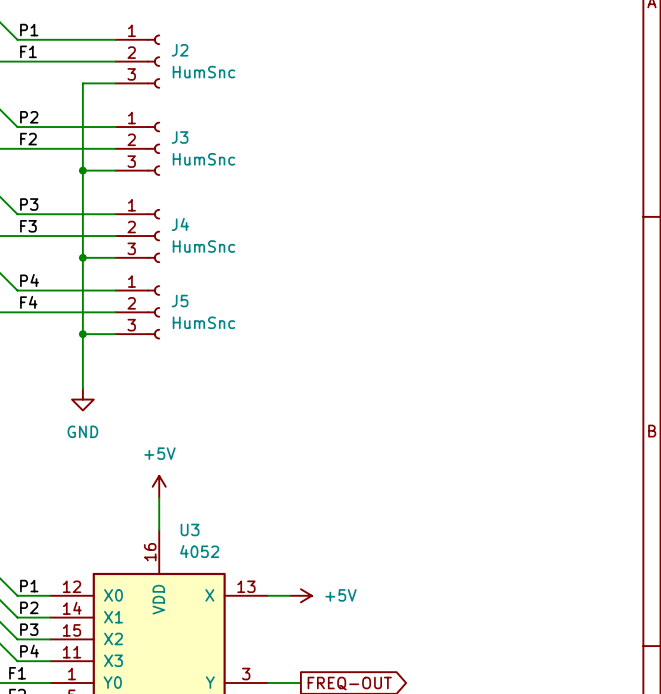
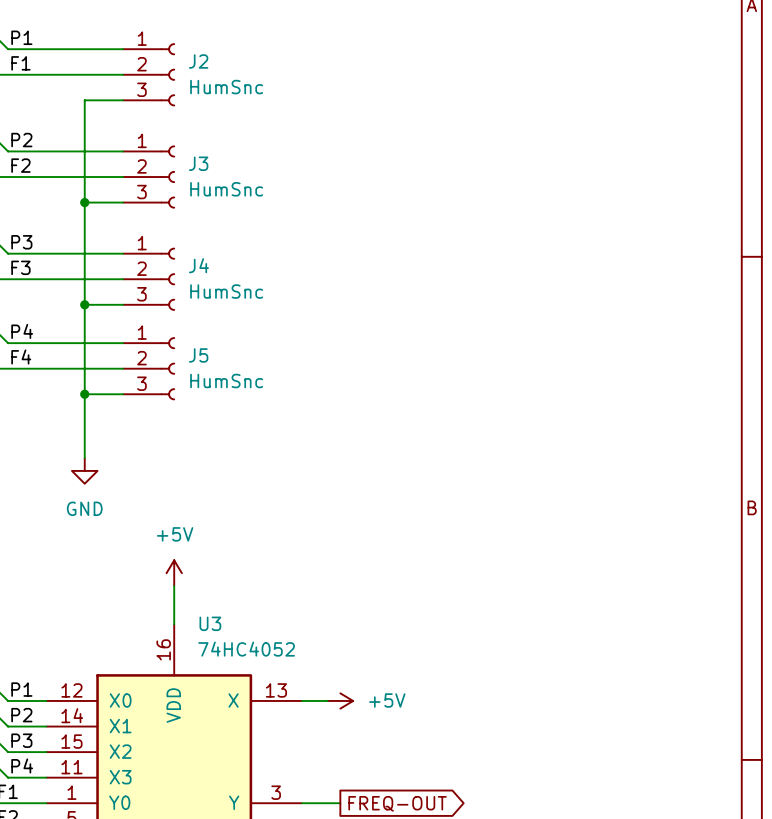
U3 value: 4052 (199, 551) -> 74HC4052 (246, 649)

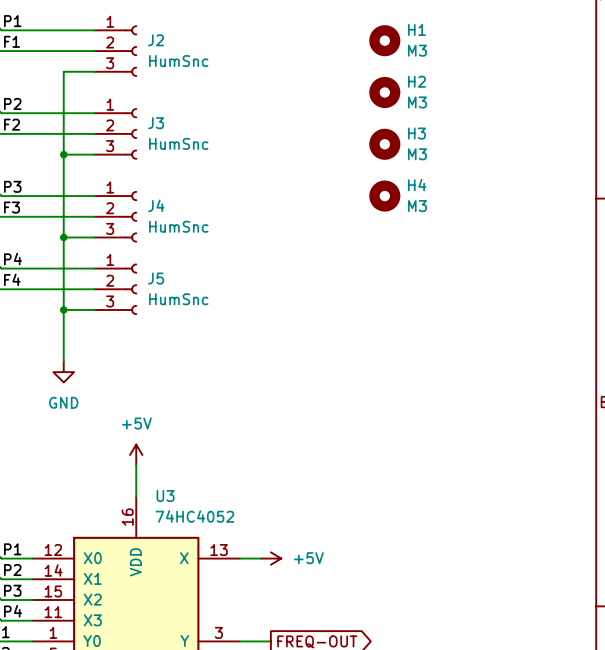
H1: none -> M3 (384, 40)
H2: none -> M3 (384, 92)
H3: none -> M3 (384, 144)
H4: none -> M3 (384, 196)

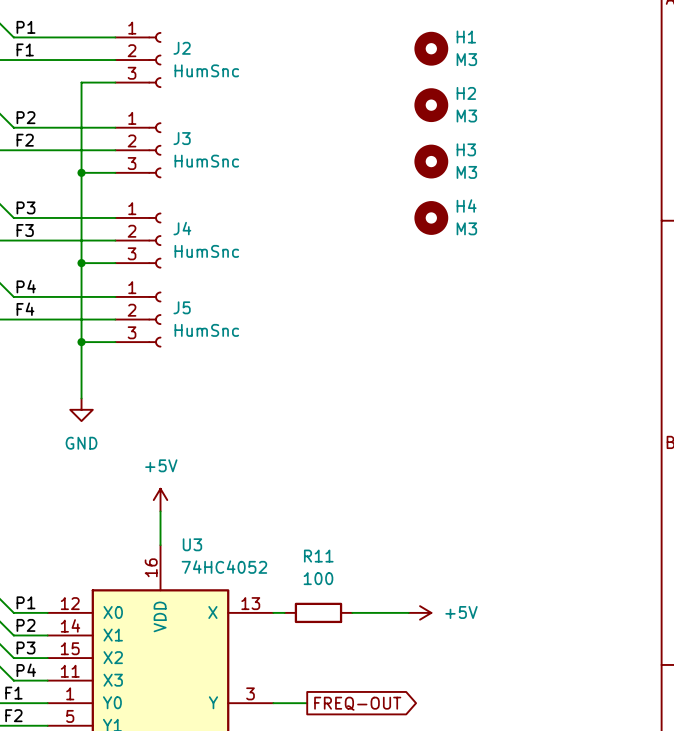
power symbol position: +5V (270, 558) -> +5V (420, 612)
R11: none -> 100 (318, 612)
wire: none -> (352, 612) (408, 612)

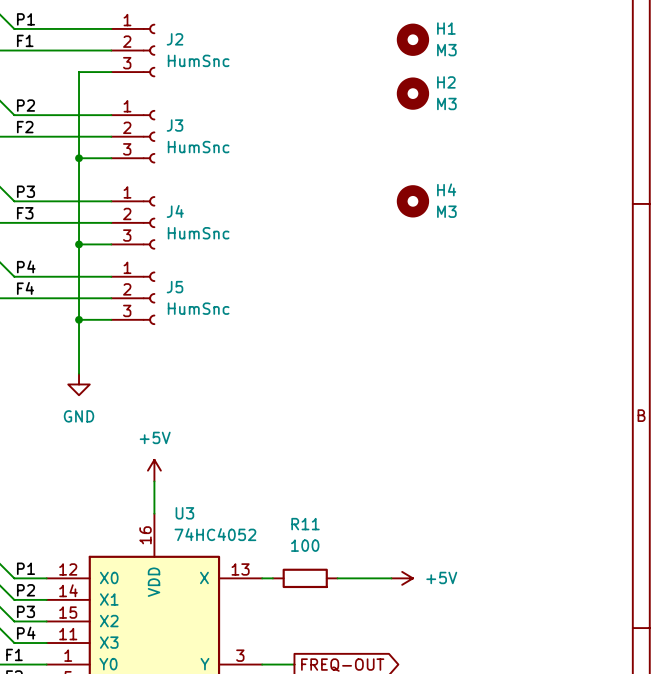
H3: M3 (431, 161) -> none

